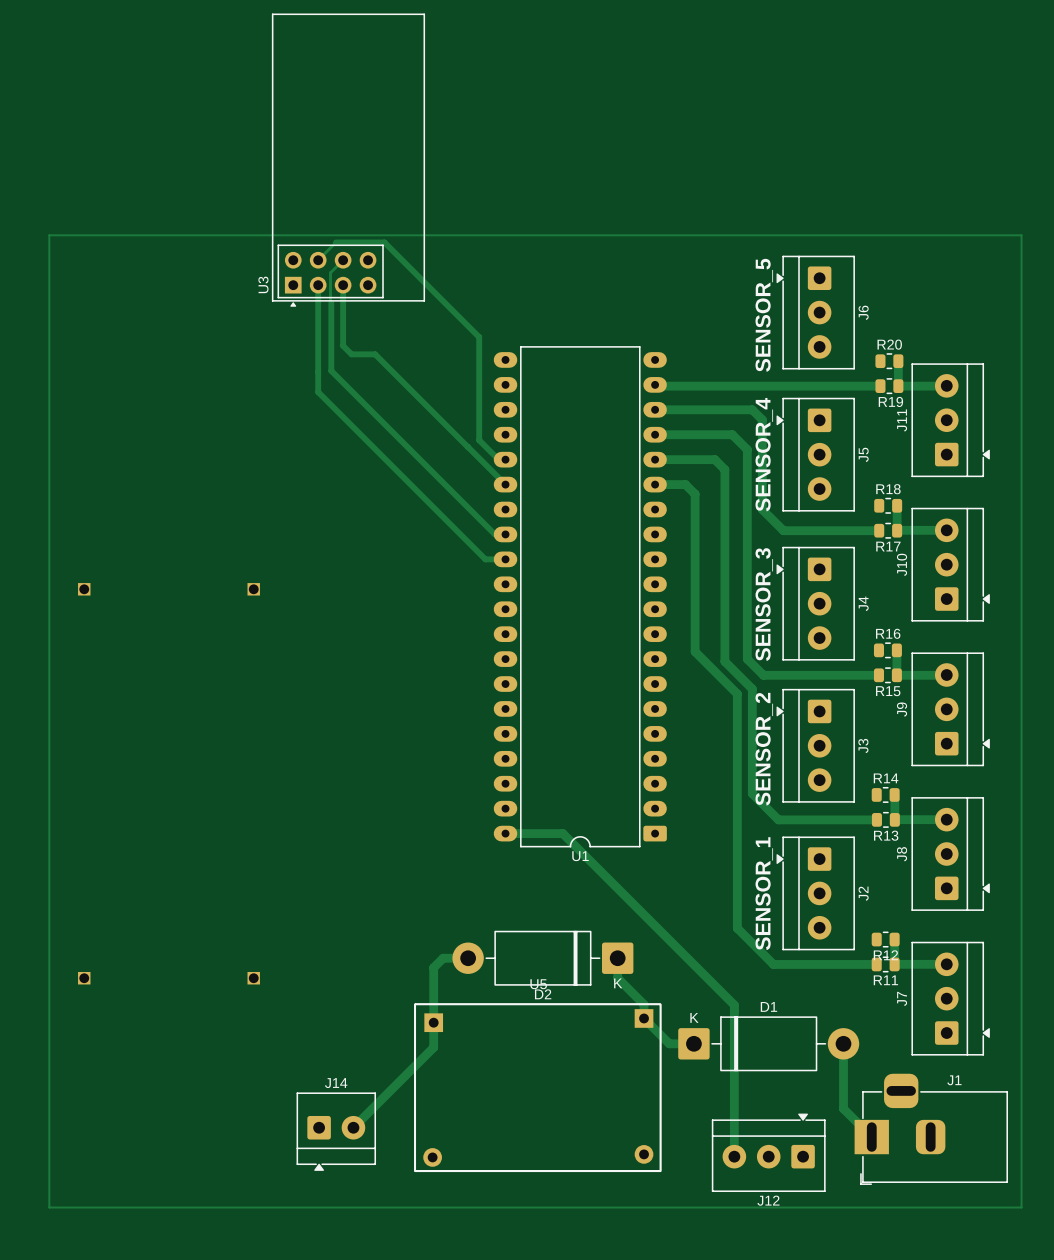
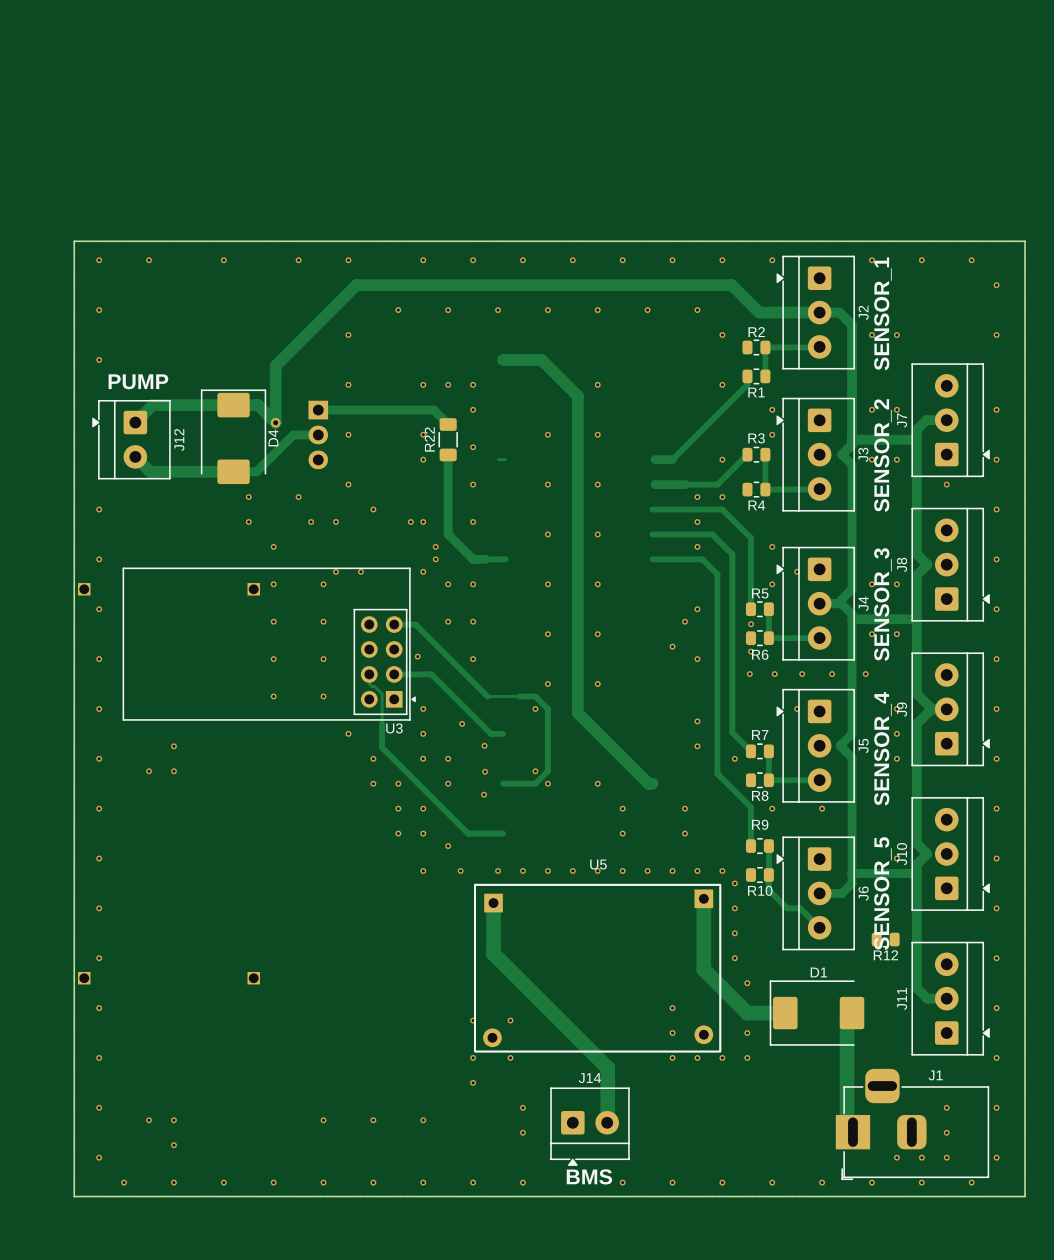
U3 rotation: 0° (348, 160) -> 90° counterclockwise (269, 644)
U3 position: (348, 160) -> (269, 644)
track: (49, 235) (1021, 235) (1021, 1207) (49, 1207) (49, 235) -> none
board edge: none -> (74, 241) (1025, 241) (1025, 1196) (74, 1196) (74, 241)
via: none -> (99, 260)
via: none -> (149, 260)
via: none -> (223, 260)
via: none -> (298, 260)
track: (318, 260) (335, 242) (384, 242) (479, 337) (479, 440) (498, 459) -> none
track: (343, 260) (330, 272) (331, 370) (494, 534) (505, 534) -> none
via: none -> (348, 260)
via: none -> (423, 260)
via: none -> (473, 260)
via: none -> (522, 260)
via: none -> (572, 260)
via: none -> (622, 260)
via: none -> (672, 260)
via: none -> (722, 260)
via: none -> (772, 260)
via: none -> (871, 260)
via: none -> (921, 260)
via: none -> (971, 260)
track: (318, 285) (318, 392) (485, 559) -> (448, 454) (448, 534) (473, 559) (485, 559)
track: (343, 285) (343, 345) (351, 354) (375, 354) (467, 447) -> none
via: none -> (996, 285)
via: none -> (99, 310)
via: none -> (398, 310)
via: none -> (448, 310)
via: none -> (498, 310)
via: none -> (547, 310)
via: none -> (597, 310)
via: none -> (647, 310)
via: none -> (697, 310)
J6 name: J6 (863, 312) -> J2 (863, 312)
text: none -> SENSOR_1 (882, 313)
text: SENSOR_5 (764, 315) -> none
via: none -> (348, 335)
via: none -> (722, 335)
via: none -> (871, 335)
via: none -> (896, 335)
via: none -> (996, 335)
track: none -> (819, 346) (765, 347) (765, 376)
R2: none -> (756, 347)
via: none -> (99, 359)
track: none -> (503, 359) (541, 359) (577, 396) (577, 712) (648, 783) (652, 783)
R20: (889, 361) -> none
track: (898, 361) (898, 386) (946, 385) -> none
R1: none -> (756, 376)
text: none -> PUMP (138, 381)
via: none -> (348, 384)
via: none -> (423, 384)
via: none -> (448, 384)
via: none -> (473, 384)
via: none -> (597, 384)
via: none -> (722, 384)
track: (656, 385) (880, 386) -> none
R19: (889, 386) -> none
track: none -> (318, 409) (433, 410) (448, 424)
via: none -> (473, 409)
track: (655, 409) (752, 409) (762, 419) (762, 509) (783, 530) (879, 530) -> none
via: none -> (772, 409)
via: none -> (871, 409)
via: none -> (896, 409)
via: none -> (996, 409)
J11 name: J11 (902, 420) -> J7 (902, 420)
track: none -> (946, 420) (926, 420) (916, 429) (916, 554) (927, 564) (916, 575) (916, 693) (932, 709)
track: none -> (135, 422) (152, 405) (257, 405) (275, 422) (275, 365) (356, 285) (731, 285) (759, 312) (839, 312) (852, 325) (852, 444) (842, 454) (852, 464) (852, 589) (837, 603)
via: none -> (275, 422)
track: none -> (318, 434) (293, 434) (256, 471) (150, 471) (135, 456)
part: none -> (318, 434)
via: none -> (348, 434)
via: none -> (423, 434)
via: none -> (547, 434)
via: none -> (597, 434)
track: (655, 434) (732, 434) (747, 449) (747, 659) (763, 675) (878, 675) -> none
via: none -> (772, 434)
D4: none -> (233, 436)
R22: none -> (448, 439)
track: none -> (852, 439) (916, 439)
track: (468, 447) (505, 484) -> none
via: none -> (473, 447)
R3: none -> (756, 454)
text: SENSOR_4 (764, 454) -> none
track: none -> (765, 454) (765, 489) (819, 489)
J5 name: J5 (863, 454) -> J3 (863, 454)
text: none -> SENSOR_2 (882, 455)
via: none -> (423, 459)
track: (672, 459) (714, 459) (724, 469) (724, 661) (752, 689) (752, 793) (778, 819) (876, 819) -> (672, 459) (747, 384) (747, 376)
via: none -> (722, 459)
via: none -> (871, 459)
via: none -> (896, 459)
via: none -> (996, 459)
via: none -> (348, 484)
via: none -> (473, 484)
via: none -> (547, 484)
via: none -> (597, 484)
track: (685, 484) (695, 494) (695, 651) (737, 693) (737, 928) (773, 964) (876, 964) -> (685, 484) (717, 484) (747, 454)
via: none -> (946, 484)
R4: none -> (756, 489)
via: none -> (248, 497)
via: none -> (298, 497)
via: none -> (697, 497)
via: none -> (722, 497)
R18: (888, 505) -> none
track: (897, 505) (897, 530) (946, 530) -> none
via: none -> (99, 509)
via: none -> (373, 509)
track: none -> (652, 509) (722, 509) (750, 538) (750, 609)
via: none -> (996, 509)
via: none -> (248, 521)
via: none -> (311, 521)
via: none -> (336, 521)
via: none -> (410, 521)
via: none -> (423, 521)
via: none -> (473, 521)
via: none -> (697, 521)
R17: (888, 530) -> none
via: none -> (547, 534)
via: none -> (597, 534)
track: none -> (652, 534) (712, 534) (732, 554) (732, 732) (750, 751)
via: none -> (273, 546)
via: none -> (435, 546)
via: none -> (697, 546)
via: none -> (772, 546)
via: none -> (99, 559)
via: none -> (435, 559)
track: none -> (652, 559) (702, 559) (717, 574) (717, 773) (750, 807) (750, 846)
via: none -> (996, 559)
J10 name: J10 (902, 564) -> J8 (902, 564)
via: none -> (336, 571)
via: none -> (360, 571)
via: none -> (423, 571)
via: none -> (797, 571)
via: none -> (273, 584)
via: none -> (323, 584)
via: none -> (448, 584)
via: none -> (473, 584)
via: none -> (547, 584)
via: none -> (597, 584)
via: none -> (772, 584)
via: none -> (871, 584)
via: none -> (896, 584)
U1: (580, 596) -> none
track: none -> (819, 603) (841, 603) (852, 614) (852, 733) (840, 745) (852, 757) (852, 883) (842, 893) (819, 893)
text position: SENSOR_3 (764, 604) -> SENSOR_3 (882, 604)
via: none -> (99, 609)
via: none -> (697, 609)
R5: none -> (759, 609)
track: none -> (768, 609) (768, 638) (819, 638)
via: none -> (996, 609)
track: none -> (852, 619) (916, 619)
via: none -> (273, 621)
via: none -> (323, 621)
via: none -> (448, 621)
via: none -> (473, 621)
via: none -> (685, 621)
track: none -> (394, 624) (415, 624) (487, 696) (535, 696) (547, 708) (547, 771) (535, 783) (503, 783)
via: none -> (751, 624)
via: none -> (547, 634)
via: none -> (597, 634)
via: none -> (871, 634)
via: none -> (896, 634)
R6: none -> (759, 638)
via: none -> (672, 646)
R16: (887, 650) -> none
track: (896, 650) (896, 675) (946, 674) -> none
via: none -> (751, 651)
via: none -> (417, 656)
via: none -> (99, 659)
via: none -> (273, 659)
via: none -> (323, 659)
via: none -> (473, 659)
via: none -> (697, 659)
via: none -> (996, 659)
track: none -> (369, 674) (369, 683) (382, 693) (382, 747) (468, 833) (503, 833)
track: none -> (394, 674) (431, 674) (491, 733) (503, 733)
via: none -> (749, 674)
via: none -> (774, 674)
via: none -> (802, 674)
via: none -> (832, 674)
via: none -> (865, 674)
R15: (887, 675) -> none
via: none -> (547, 684)
via: none -> (597, 684)
via: none -> (273, 696)
via: none -> (323, 696)
via: none -> (99, 708)
via: none -> (423, 708)
via: none -> (535, 708)
via: none -> (797, 708)
via: none -> (896, 708)
via: none -> (996, 708)
track: none -> (946, 709) (931, 709) (916, 723) (916, 843) (927, 854) (916, 864) (916, 988) (927, 998) (946, 998)
via: none -> (697, 721)
via: none -> (462, 723)
via: none -> (348, 733)
via: none -> (423, 733)
via: none -> (896, 733)
via: none -> (484, 745)
J3 name: J3 (863, 745) -> J5 (863, 745)
via: none -> (173, 746)
via: none -> (697, 746)
text: none -> SENSOR_4 (882, 748)
text: SENSOR_2 (764, 749) -> none
R7: none -> (759, 751)
track: none -> (768, 751) (768, 780) (819, 780)
via: none -> (99, 758)
via: none -> (373, 758)
via: none -> (423, 758)
via: none -> (448, 758)
via: none -> (734, 758)
via: none -> (896, 758)
via: none -> (996, 758)
via: none -> (149, 771)
via: none -> (173, 771)
via: none -> (485, 771)
via: none -> (535, 771)
R8: none -> (759, 780)
via: none -> (373, 783)
via: none -> (398, 783)
via: none -> (448, 783)
via: none -> (547, 783)
via: none -> (597, 783)
via: none -> (484, 794)
R14: (885, 794) -> none
track: (894, 794) (894, 819) (946, 819) -> none
via: none -> (99, 808)
via: none -> (398, 808)
via: none -> (423, 808)
via: none -> (622, 808)
via: none -> (685, 808)
via: none -> (772, 808)
via: none -> (822, 808)
via: none -> (996, 808)
R13: (885, 819) -> none
via: none -> (398, 833)
via: none -> (423, 833)
track: (505, 833) (562, 833) (734, 1005) (734, 1156) -> none
via: none -> (622, 833)
via: none -> (685, 833)
via: none -> (448, 846)
R9: none -> (759, 846)
track: none -> (768, 846) (768, 890) (787, 908) (800, 908) (819, 927)
J8 name: J8 (902, 854) -> J10 (902, 854)
via: none -> (99, 858)
via: none -> (896, 858)
via: none -> (996, 858)
via: none -> (423, 870)
via: none -> (460, 870)
via: none -> (498, 870)
via: none -> (522, 870)
via: none -> (547, 870)
via: none -> (572, 870)
via: none -> (597, 870)
via: none -> (622, 870)
via: none -> (647, 870)
via: none -> (672, 870)
via: none -> (697, 870)
via: none -> (722, 870)
track: none -> (852, 873) (911, 873) (916, 878)
R10: none -> (759, 875)
via: none -> (734, 883)
text: SENSOR_1 (764, 893) -> none
J2 name: J2 (863, 893) -> J6 (863, 893)
text: none -> SENSOR_5 (882, 893)
track: none -> (704, 898) (703, 969) (747, 1013) (785, 1013)
track: none -> (493, 903) (493, 953) (607, 1067) (607, 1122)
via: none -> (99, 908)
via: none -> (734, 908)
via: none -> (996, 908)
via: none -> (734, 933)
track: (894, 939) (894, 964) (946, 964) -> none
via: none -> (99, 958)
track: (468, 958) (443, 958) (433, 967) (433, 1047) (353, 1127) -> none
D2: (542, 958) -> none
track: (617, 958) (617, 978) (644, 1004) (644, 1018) (669, 1043) (693, 1043) -> none
via: none -> (734, 958)
via: none -> (996, 958)
R11: (885, 964) -> none
via: none -> (747, 983)
J7 name: J7 (902, 998) -> J11 (902, 998)
via: none -> (99, 1008)
via: none -> (672, 1008)
via: none -> (996, 1008)
track: none -> (852, 1013) (847, 1019) (847, 1126) (852, 1132)
D1 footprint: [678, 1016, 860, 1072] -> [769, 980, 865, 1046]
via: none -> (473, 1020)
via: none -> (510, 1020)
via: none -> (672, 1033)
via: none -> (747, 1033)
track: (843, 1043) (843, 1108) (871, 1137) -> none
via: none -> (99, 1057)
via: none -> (473, 1057)
via: none -> (510, 1057)
via: none -> (672, 1057)
via: none -> (697, 1057)
via: none -> (722, 1057)
via: none -> (747, 1057)
via: none -> (996, 1057)
via: none -> (473, 1082)
U5 position: (537, 1087) -> (597, 968)
via: none -> (99, 1107)
via: none -> (522, 1107)
via: none -> (946, 1107)
via: none -> (996, 1107)
J12 footprint: [711, 1113, 826, 1192] -> [92, 400, 171, 480]
via: none -> (149, 1120)
via: none -> (173, 1120)
via: none -> (323, 1120)
via: none -> (373, 1120)
via: none -> (423, 1120)
J1 position: (931, 1129) -> (912, 1124)
J14 position: (336, 1131) -> (590, 1126)
via: none -> (522, 1132)
via: none -> (946, 1132)
via: none -> (173, 1145)
via: none -> (99, 1157)
via: none -> (896, 1157)
via: none -> (921, 1157)
via: none -> (946, 1157)
via: none -> (996, 1157)
text: none -> BMS (589, 1176)
via: none -> (124, 1182)
via: none -> (173, 1182)
via: none -> (223, 1182)
via: none -> (273, 1182)
via: none -> (323, 1182)
via: none -> (373, 1182)
via: none -> (423, 1182)
via: none -> (473, 1182)
via: none -> (522, 1182)
via: none -> (622, 1182)
via: none -> (672, 1182)
via: none -> (722, 1182)
via: none -> (772, 1182)
via: none -> (822, 1182)
via: none -> (871, 1182)
via: none -> (921, 1182)
via: none -> (971, 1182)
J12 name position: J12 (768, 1200) -> J12 (179, 439)

